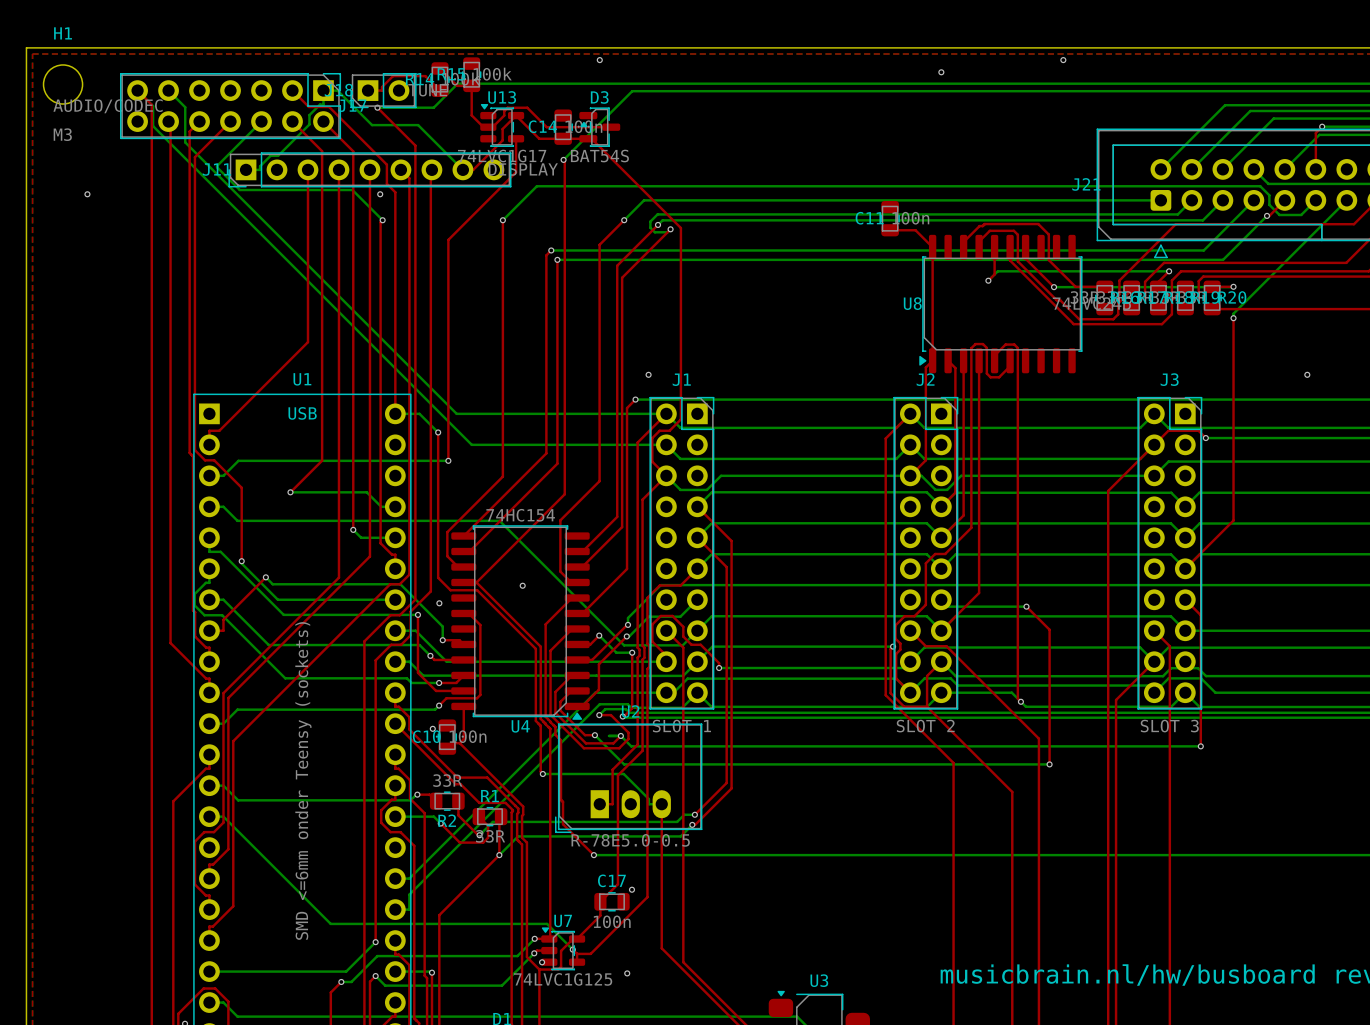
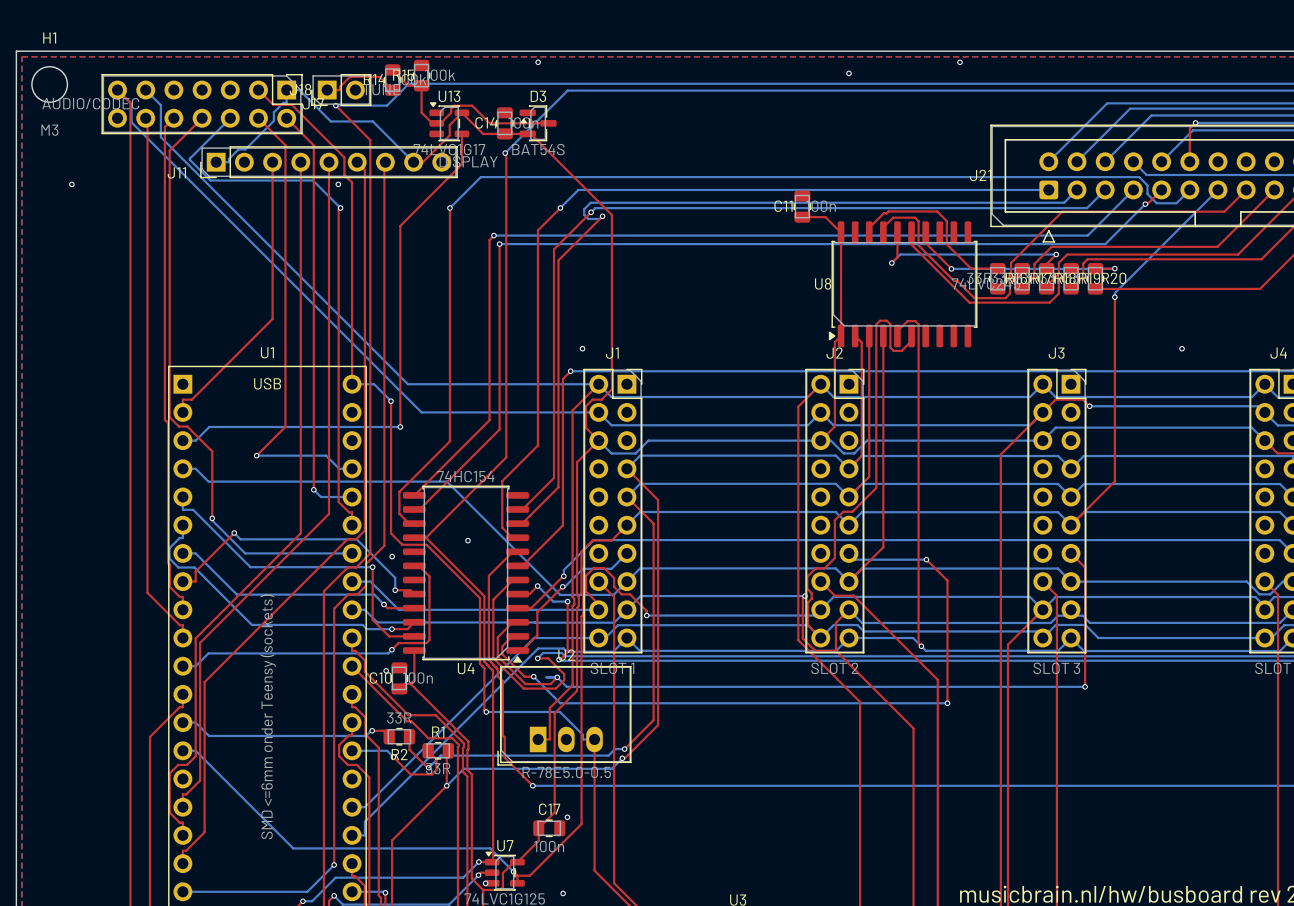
J11 name position: J11 (216, 169) -> J11 (176, 172)

